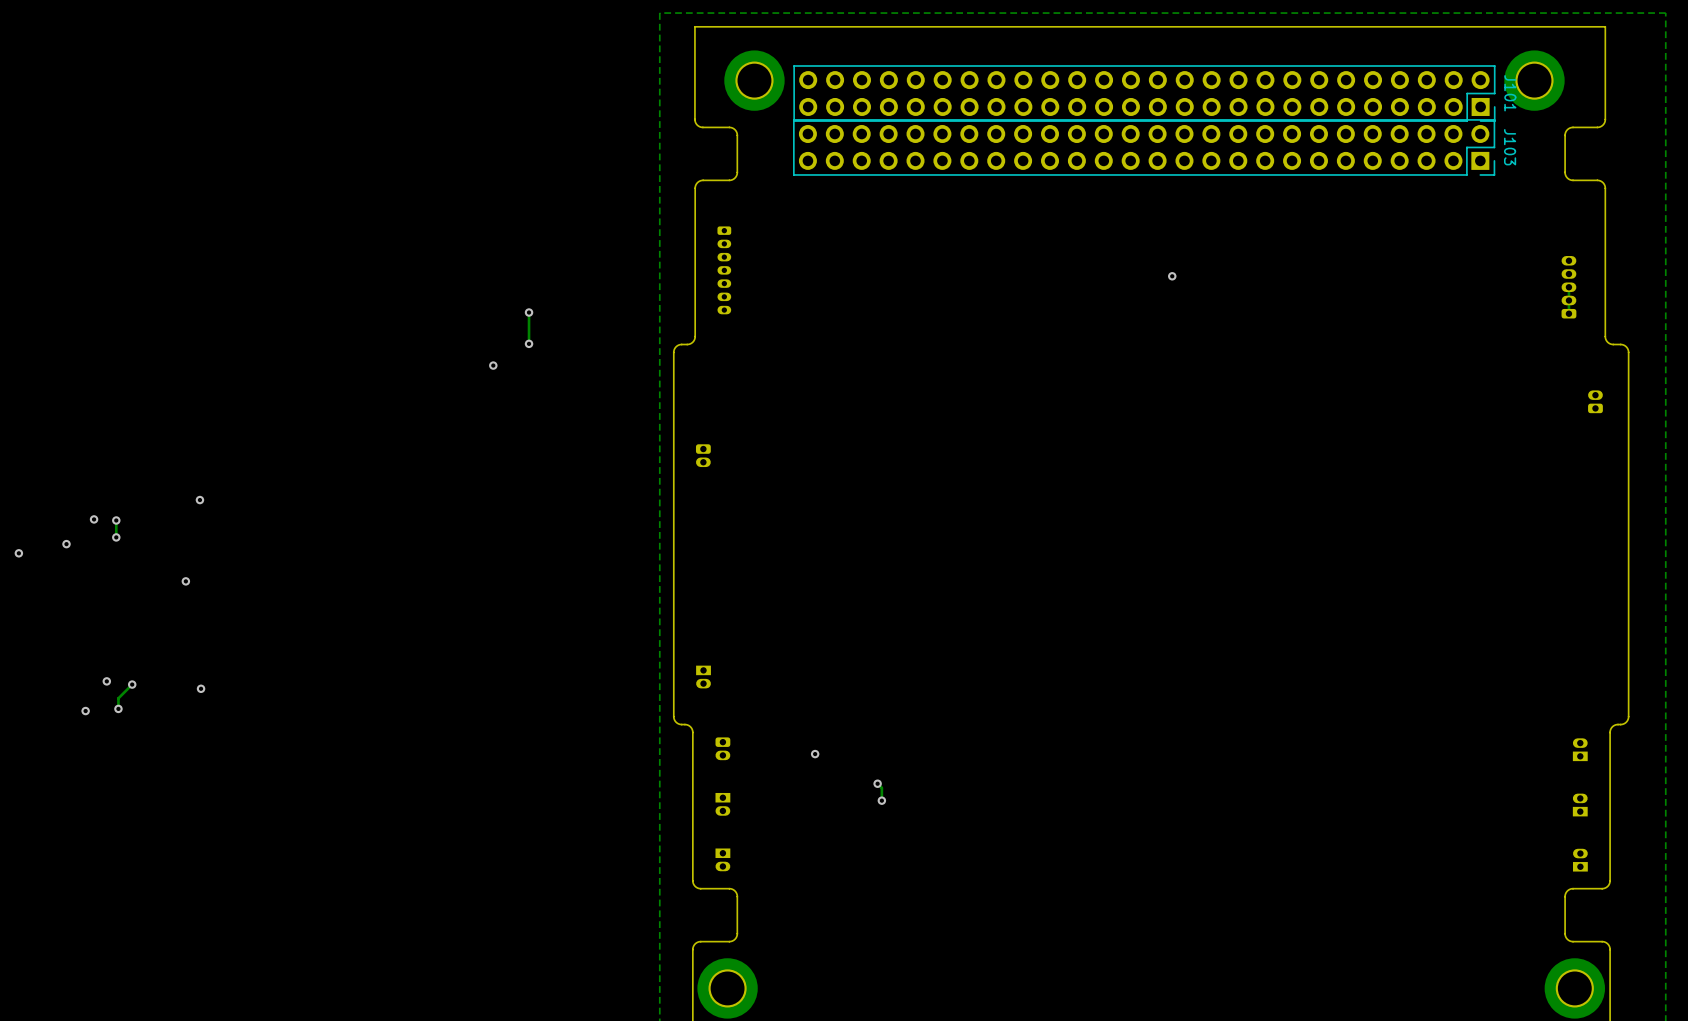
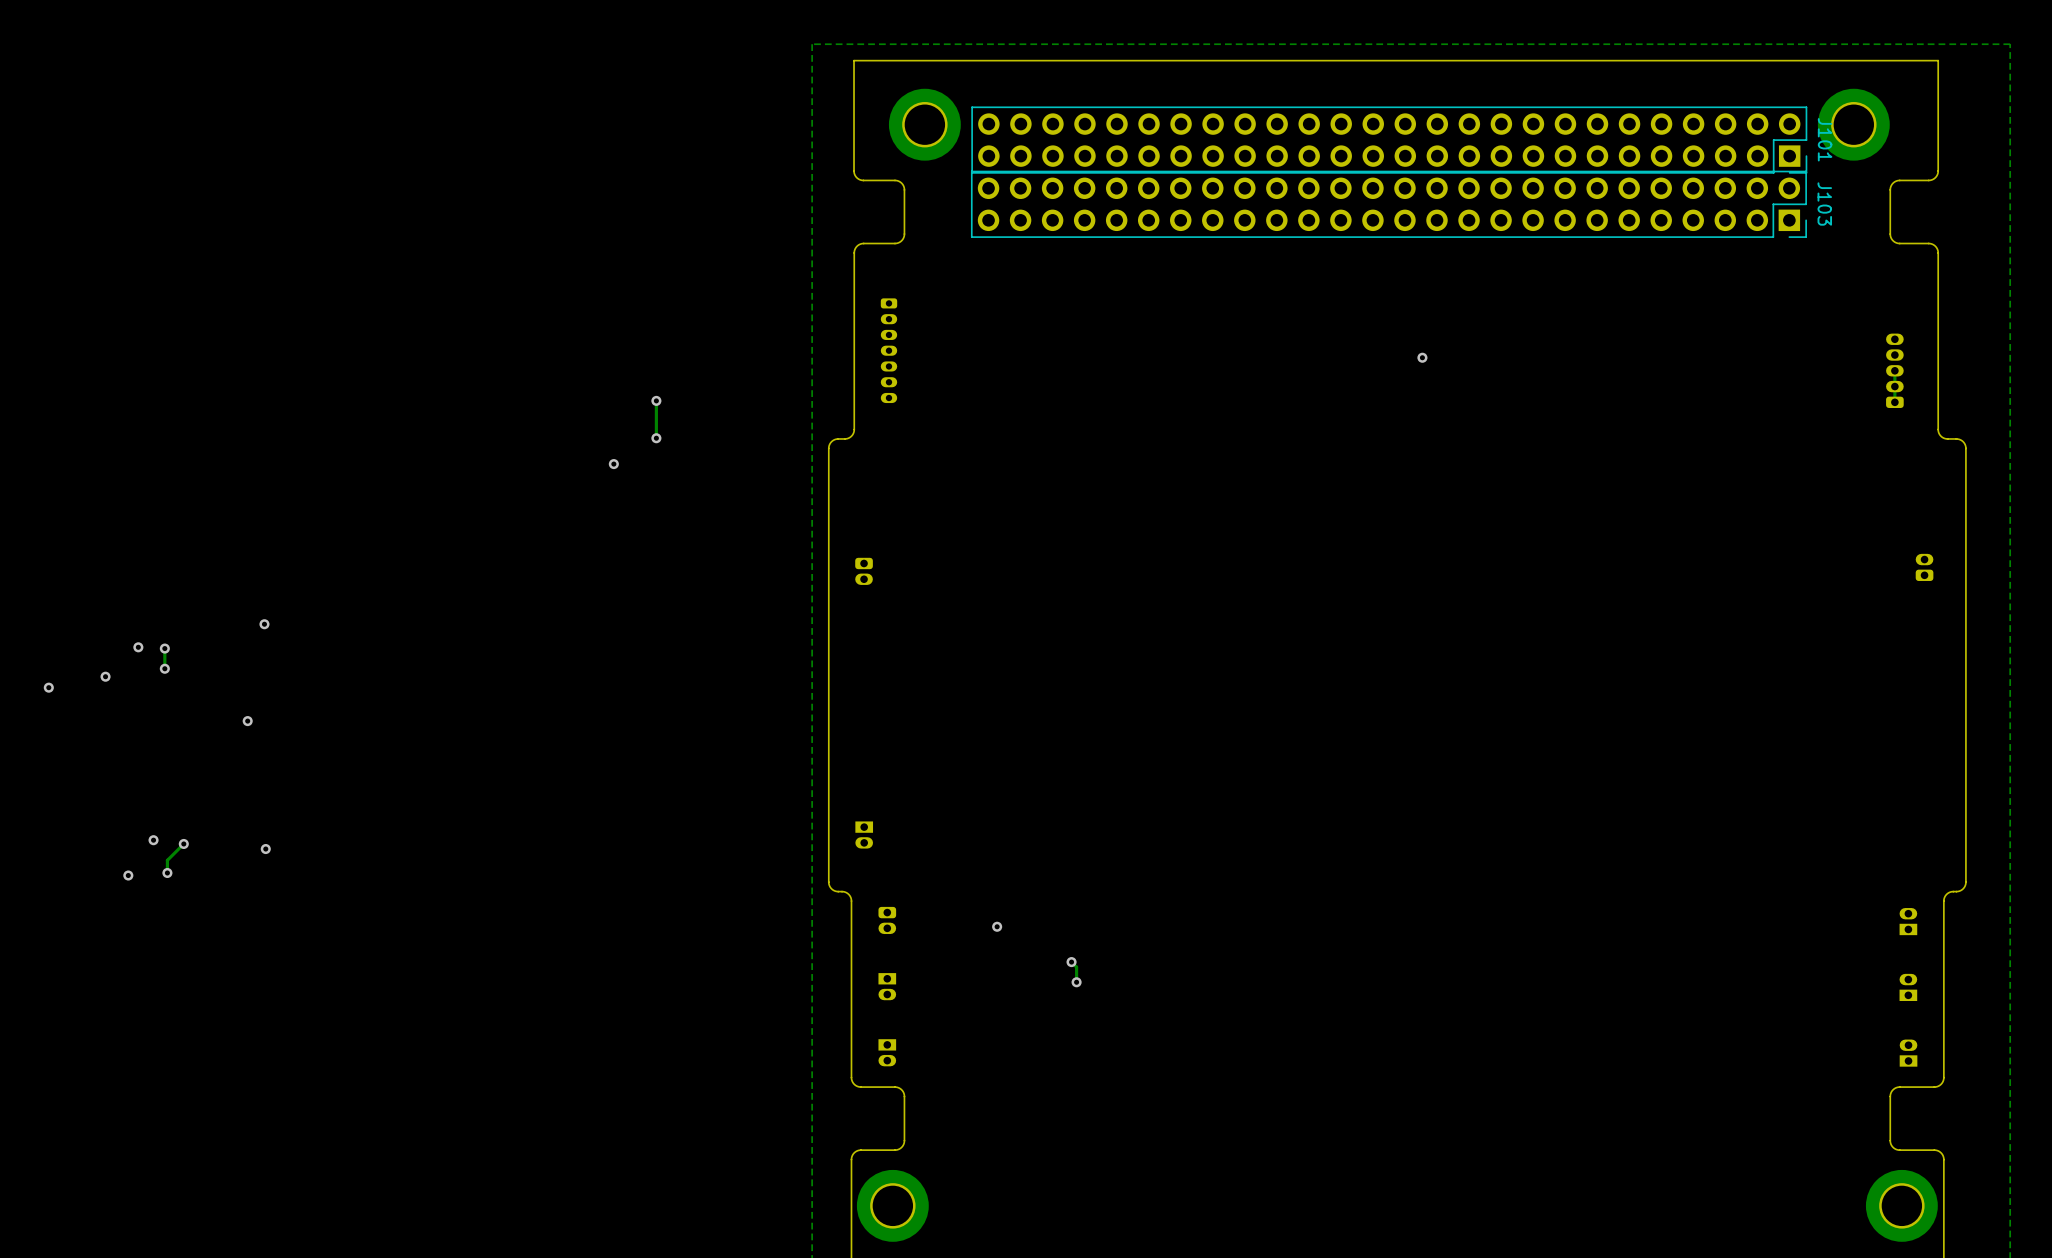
part position: (1595, 401) -> (1924, 567)

